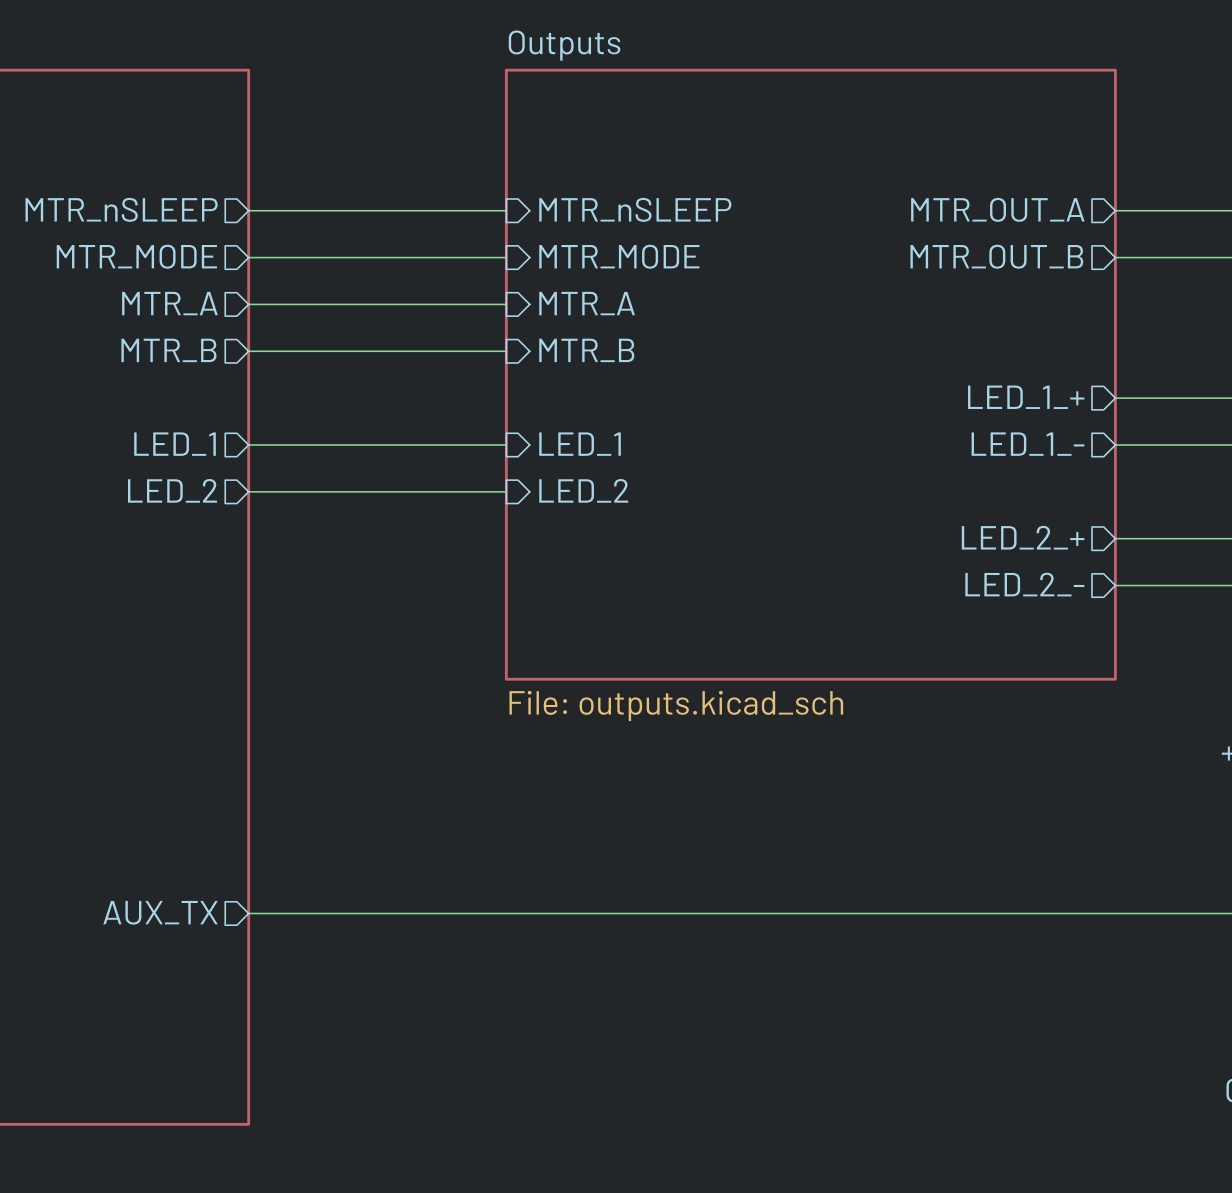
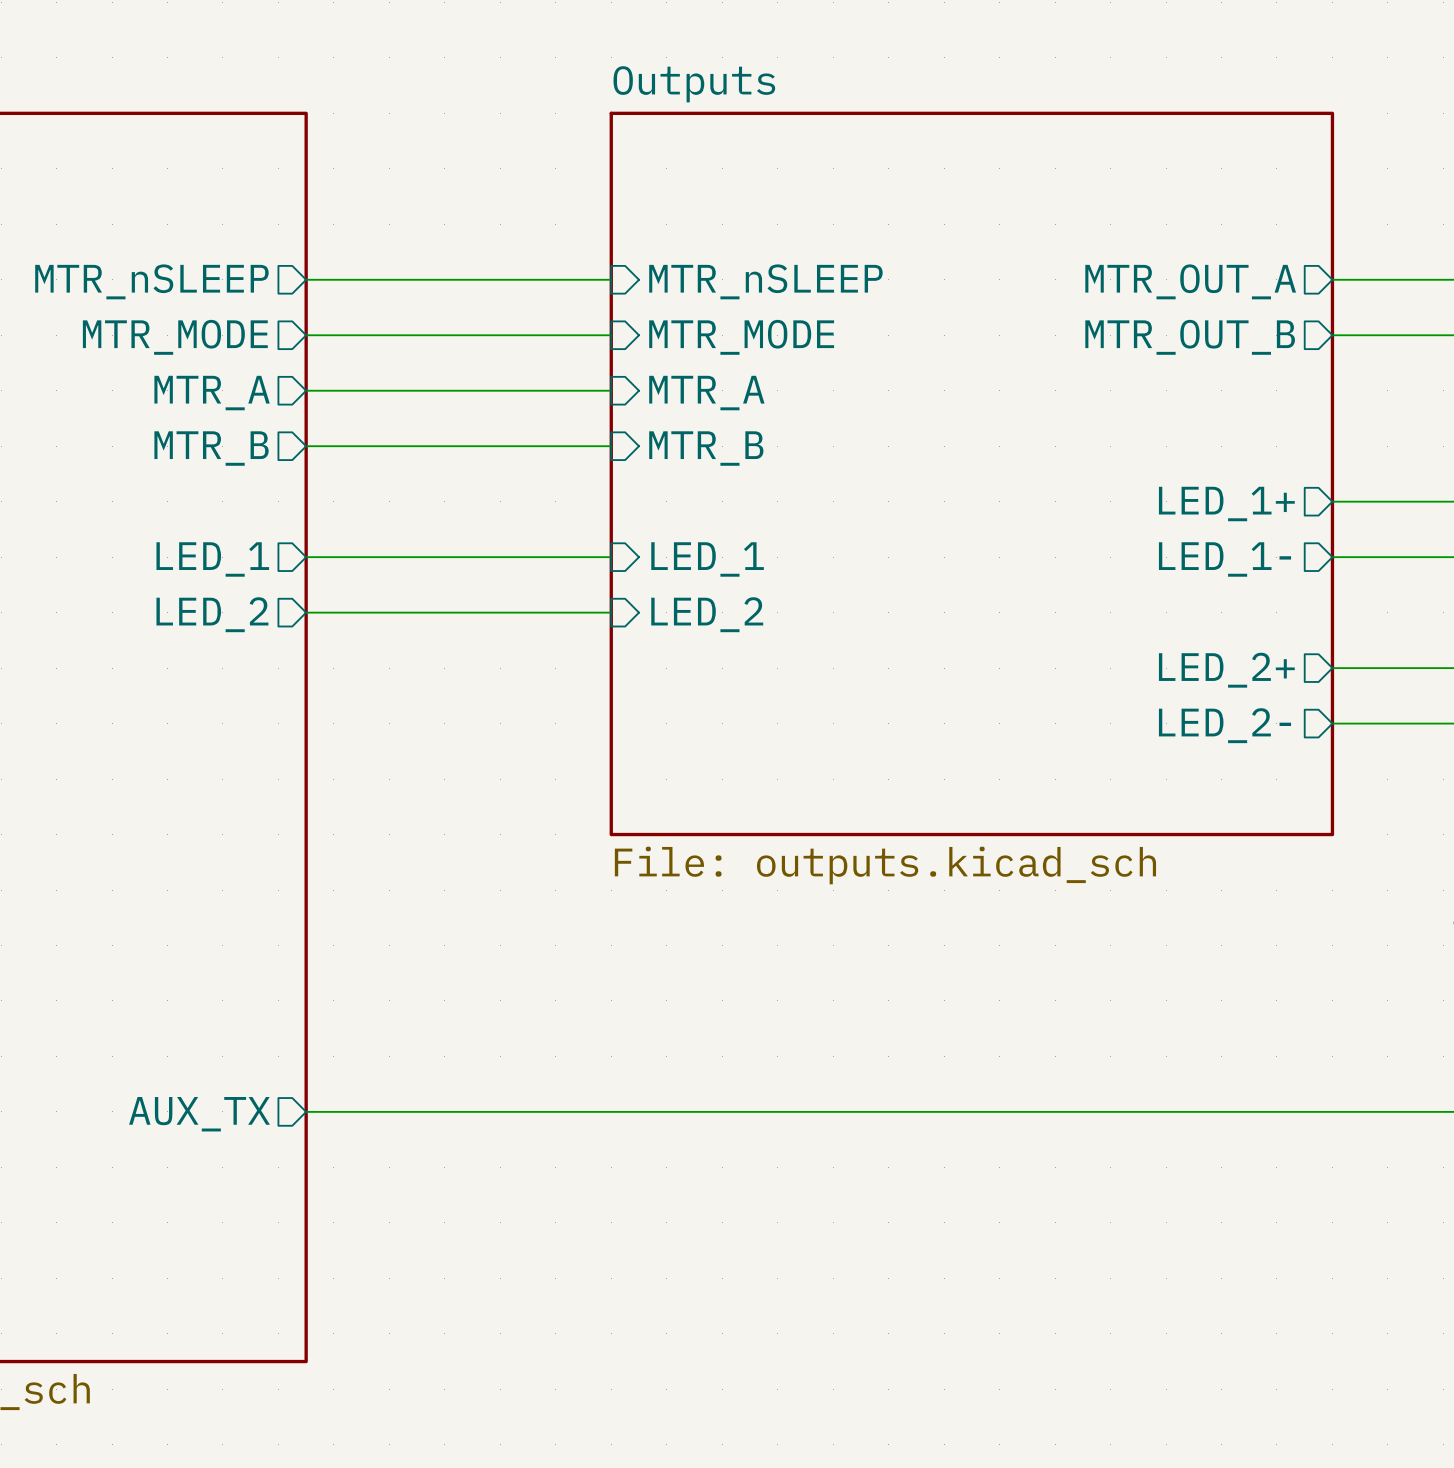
sheet pin: LED_1_+ (1026, 397) -> LED_1+ (1226, 504)
sheet pin: LED_1_- (1027, 444) -> LED_1- (1224, 559)
sheet pin: LED_2_+ (1023, 537) -> LED_2+ (1226, 670)
sheet pin: LED_2_- (1024, 584) -> LED_2- (1224, 725)

